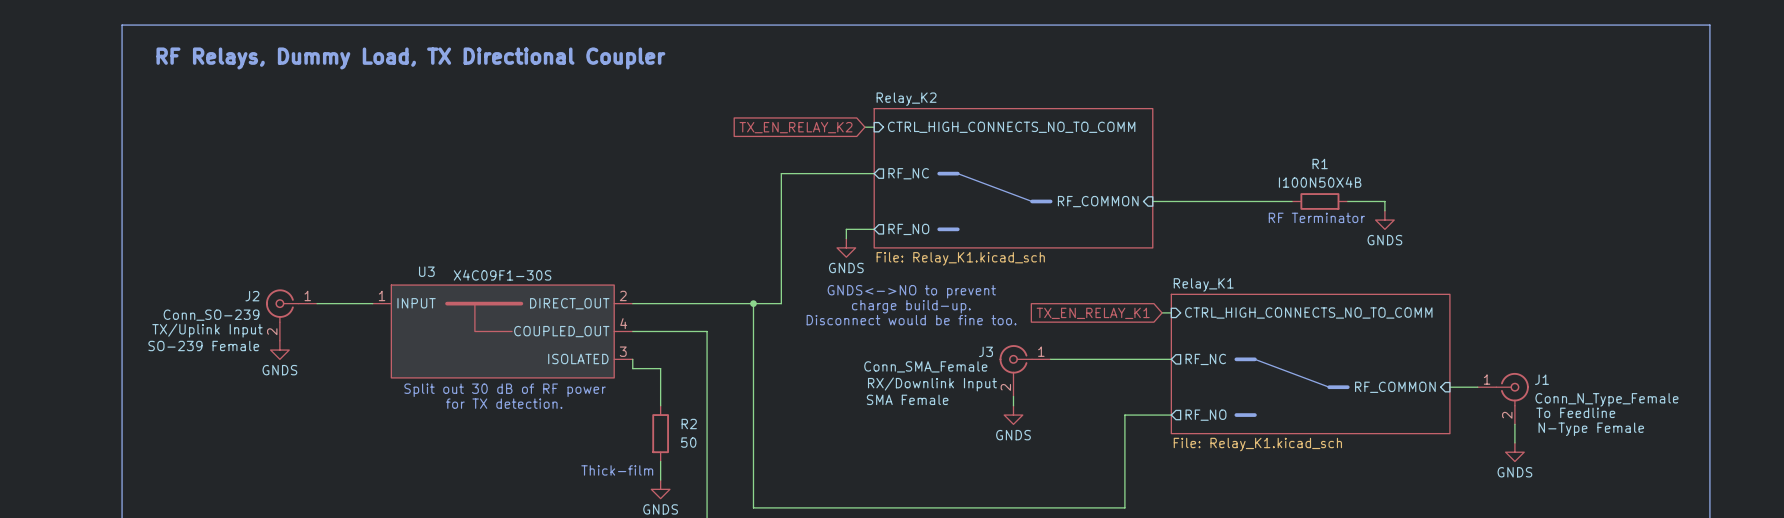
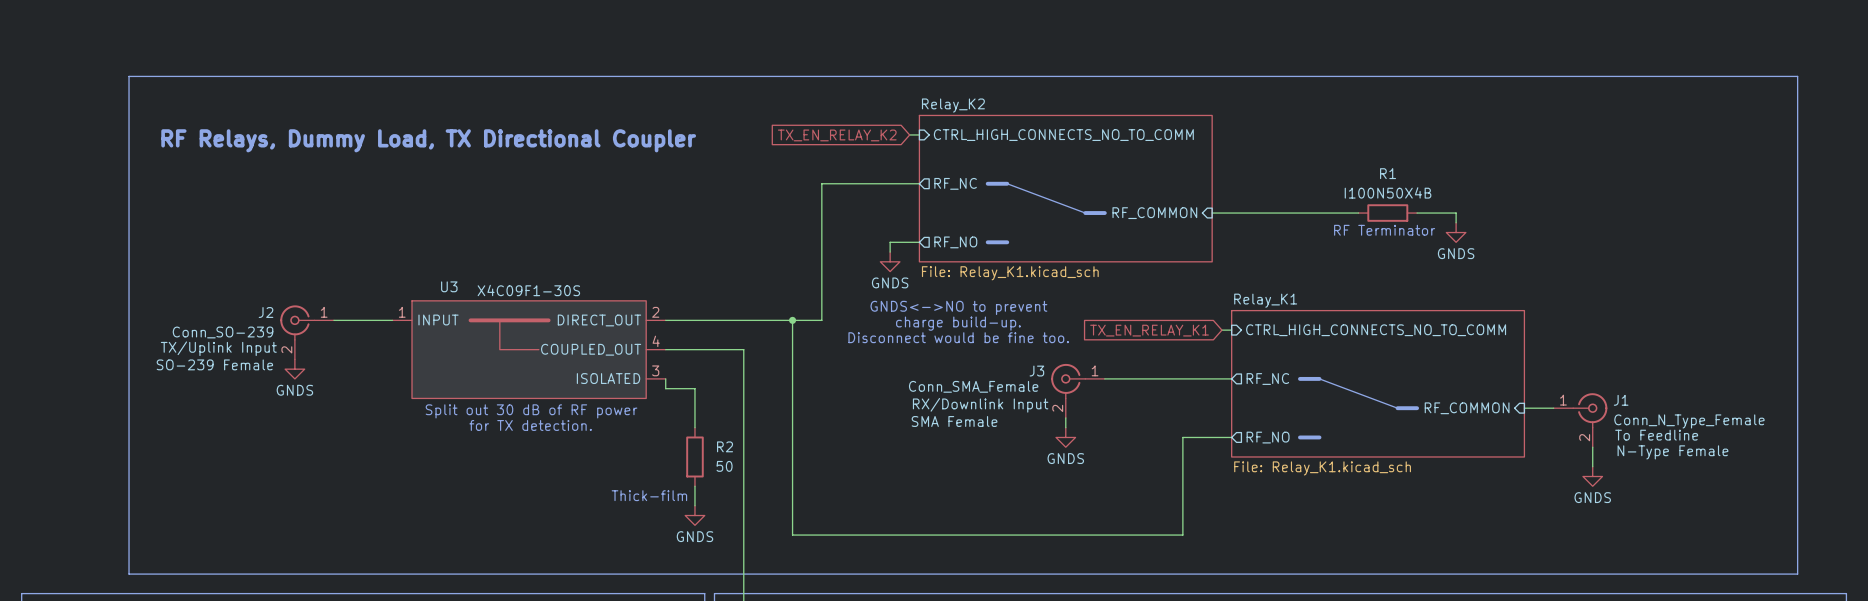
text position: RF Relays, Dummy Load, TX Directional Coupler (410, 58) -> RF Relays, Dummy Load, TX Directional Coupler (428, 140)
line: (122, 71) (122, 25) (1709, 25) (1709, 71) -> (129, 76) (1797, 76)

